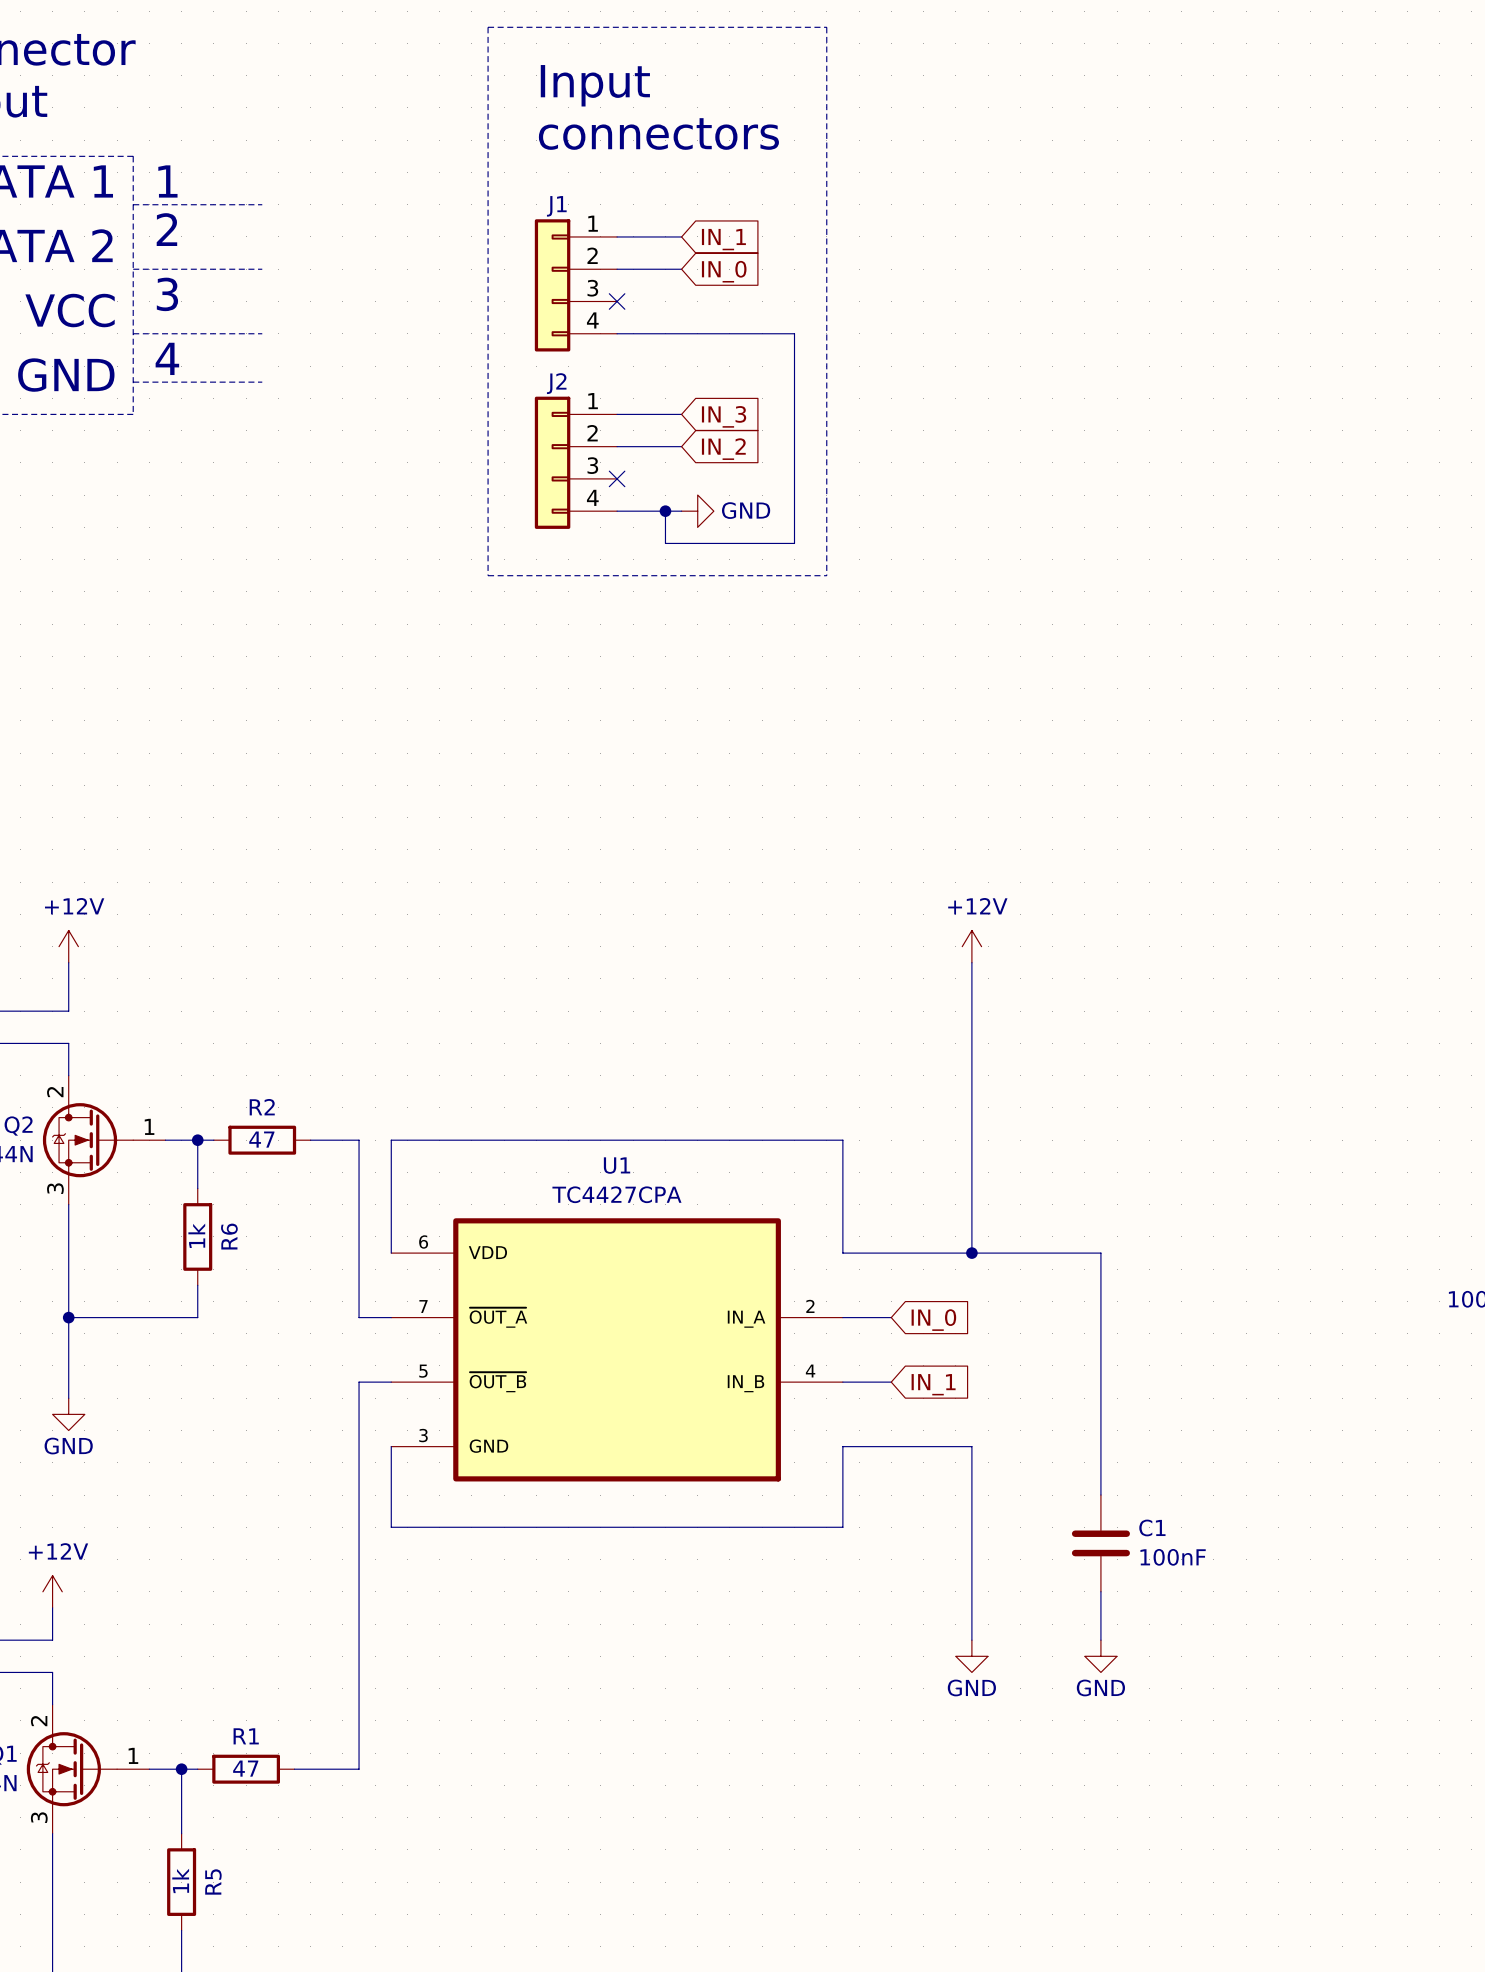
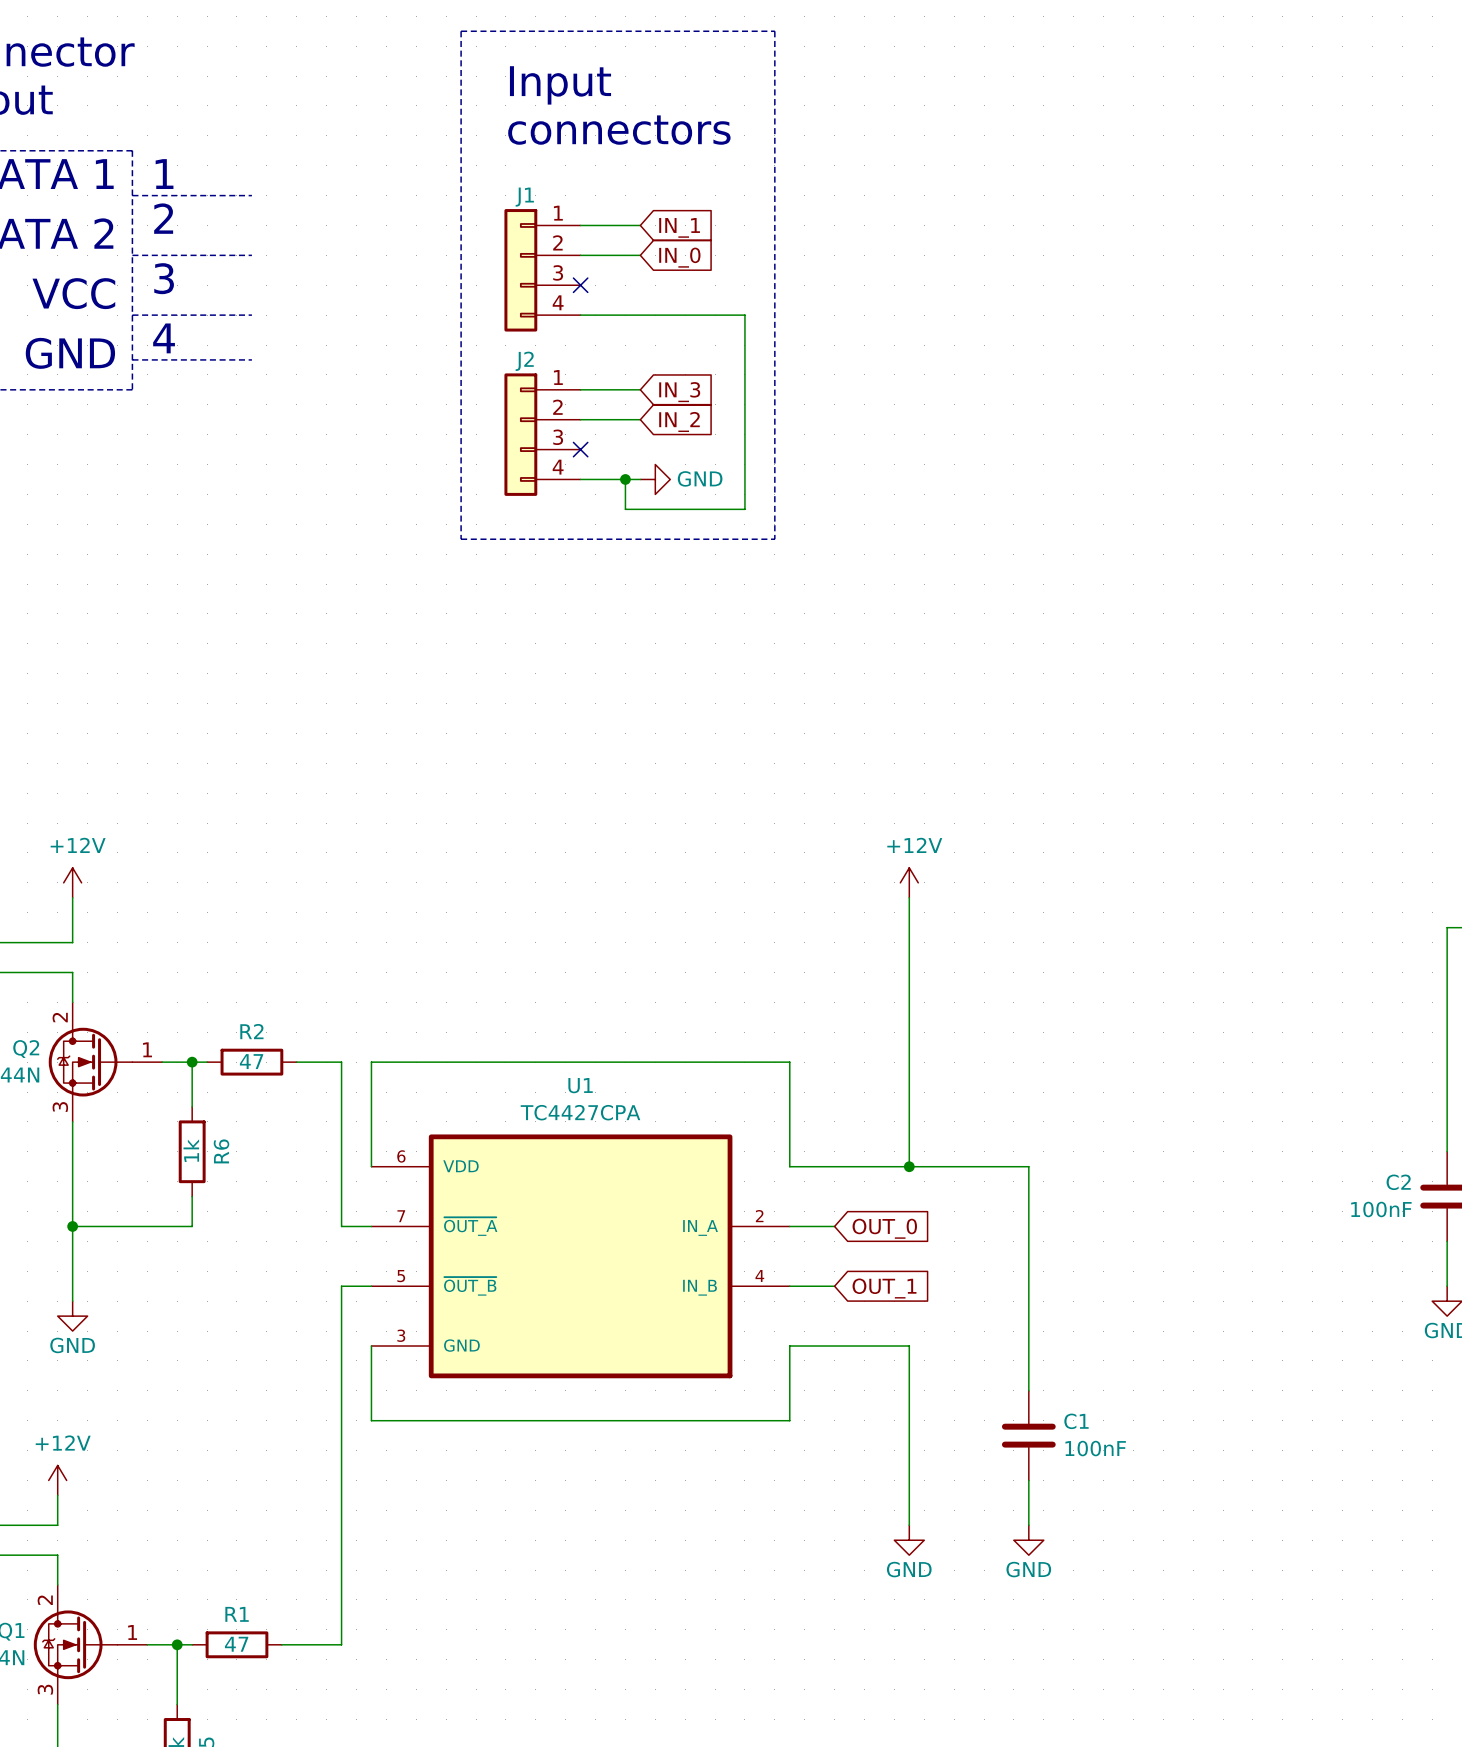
global label: IN_0 (933, 1320) -> OUT_0 (884, 1228)
global label: IN_1 (933, 1384) -> OUT_1 (884, 1288)

